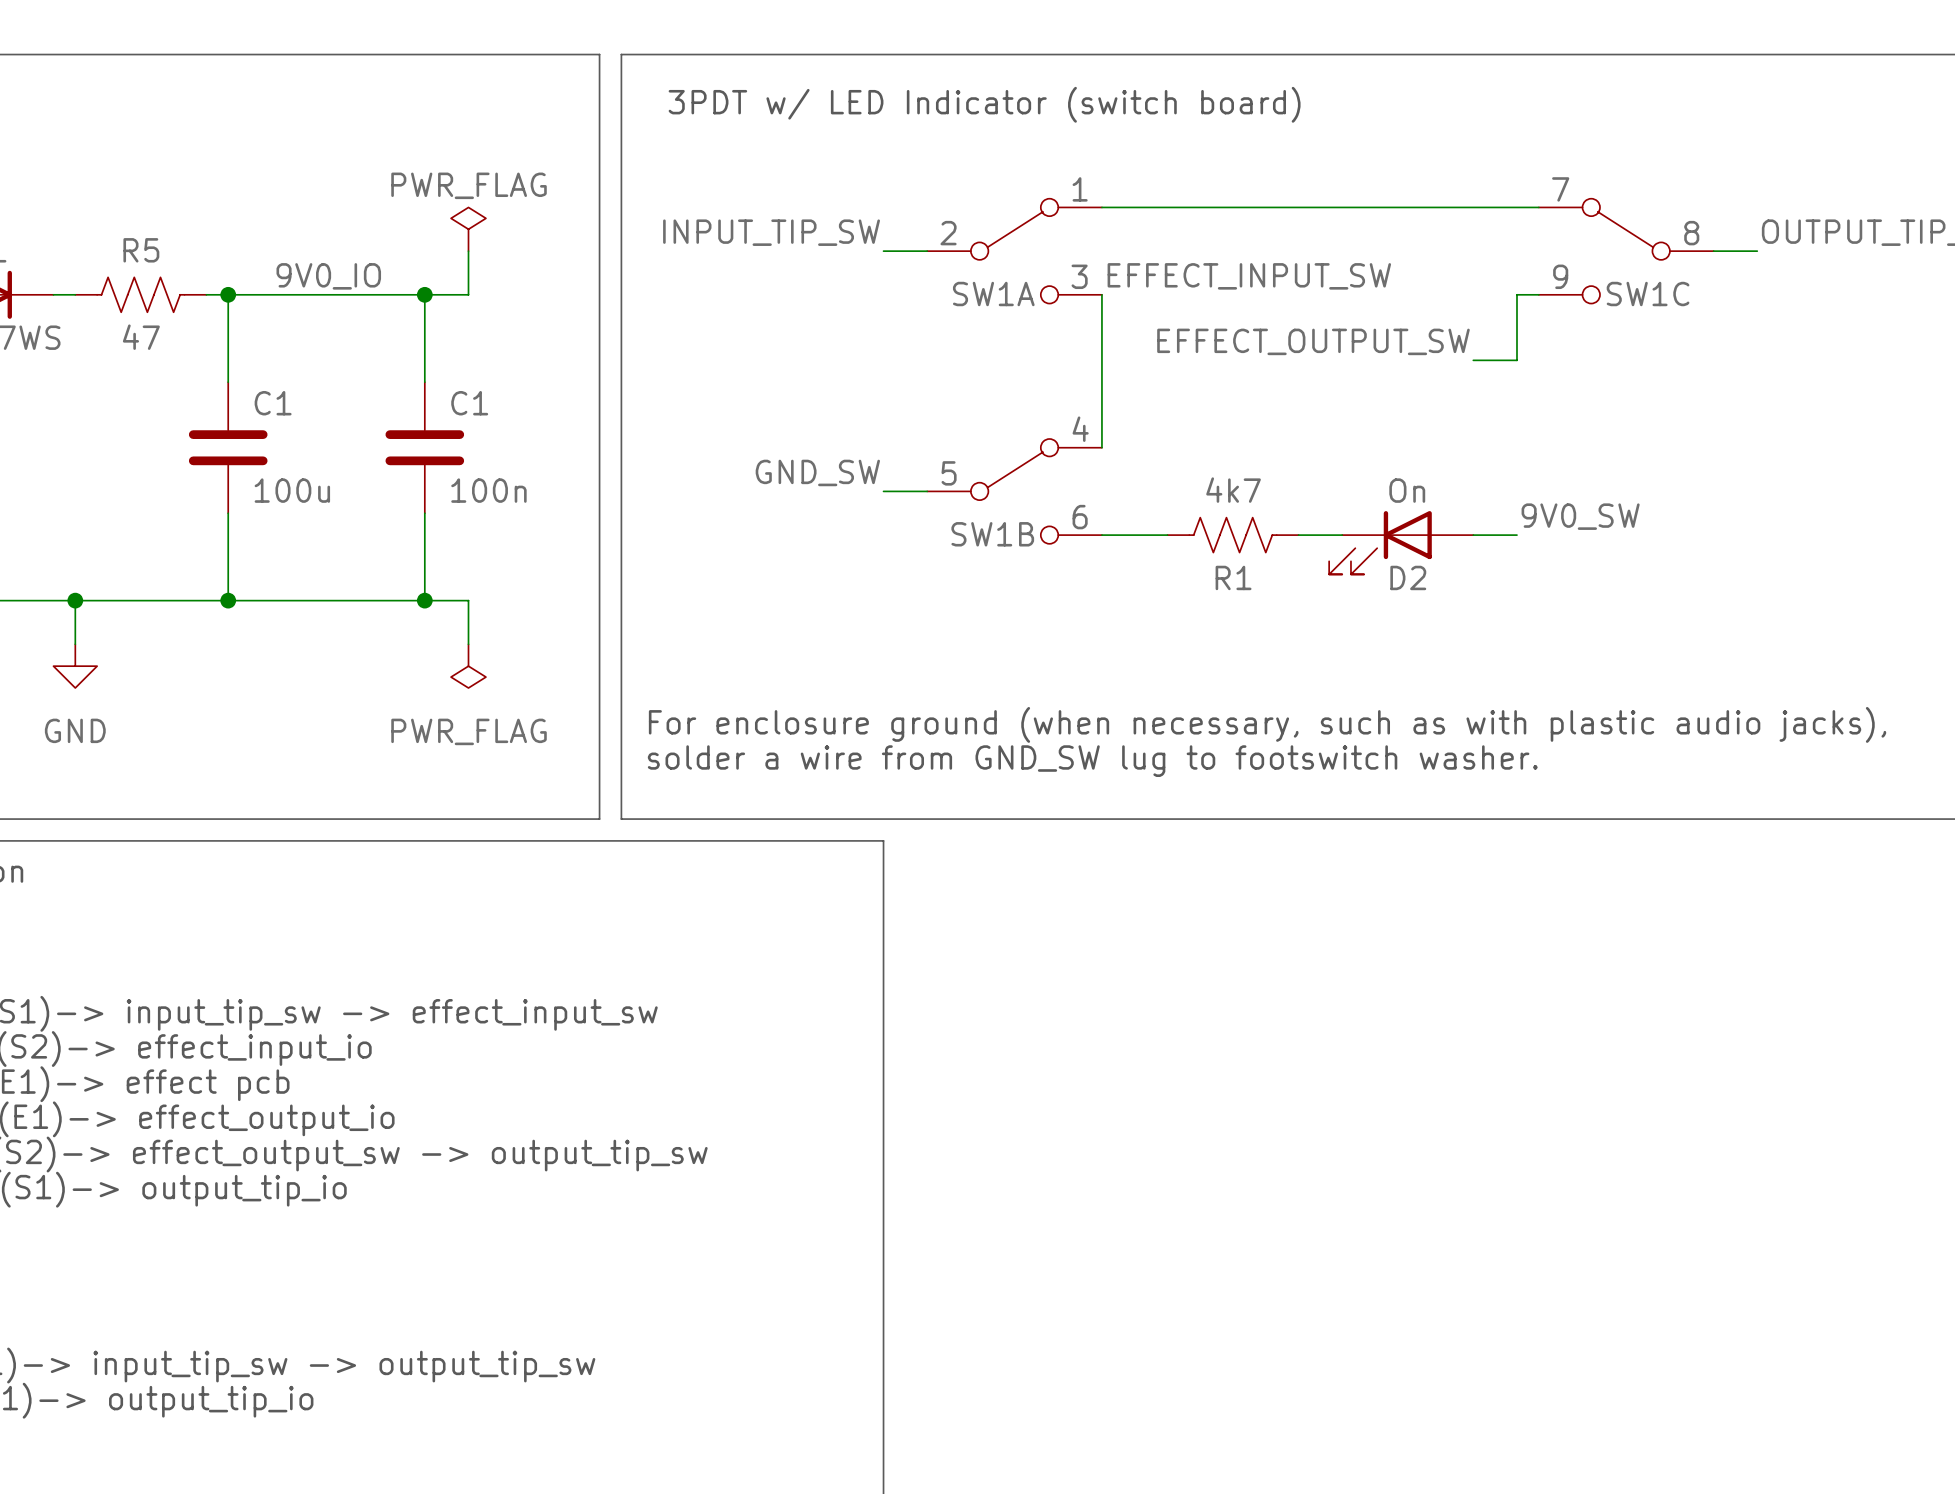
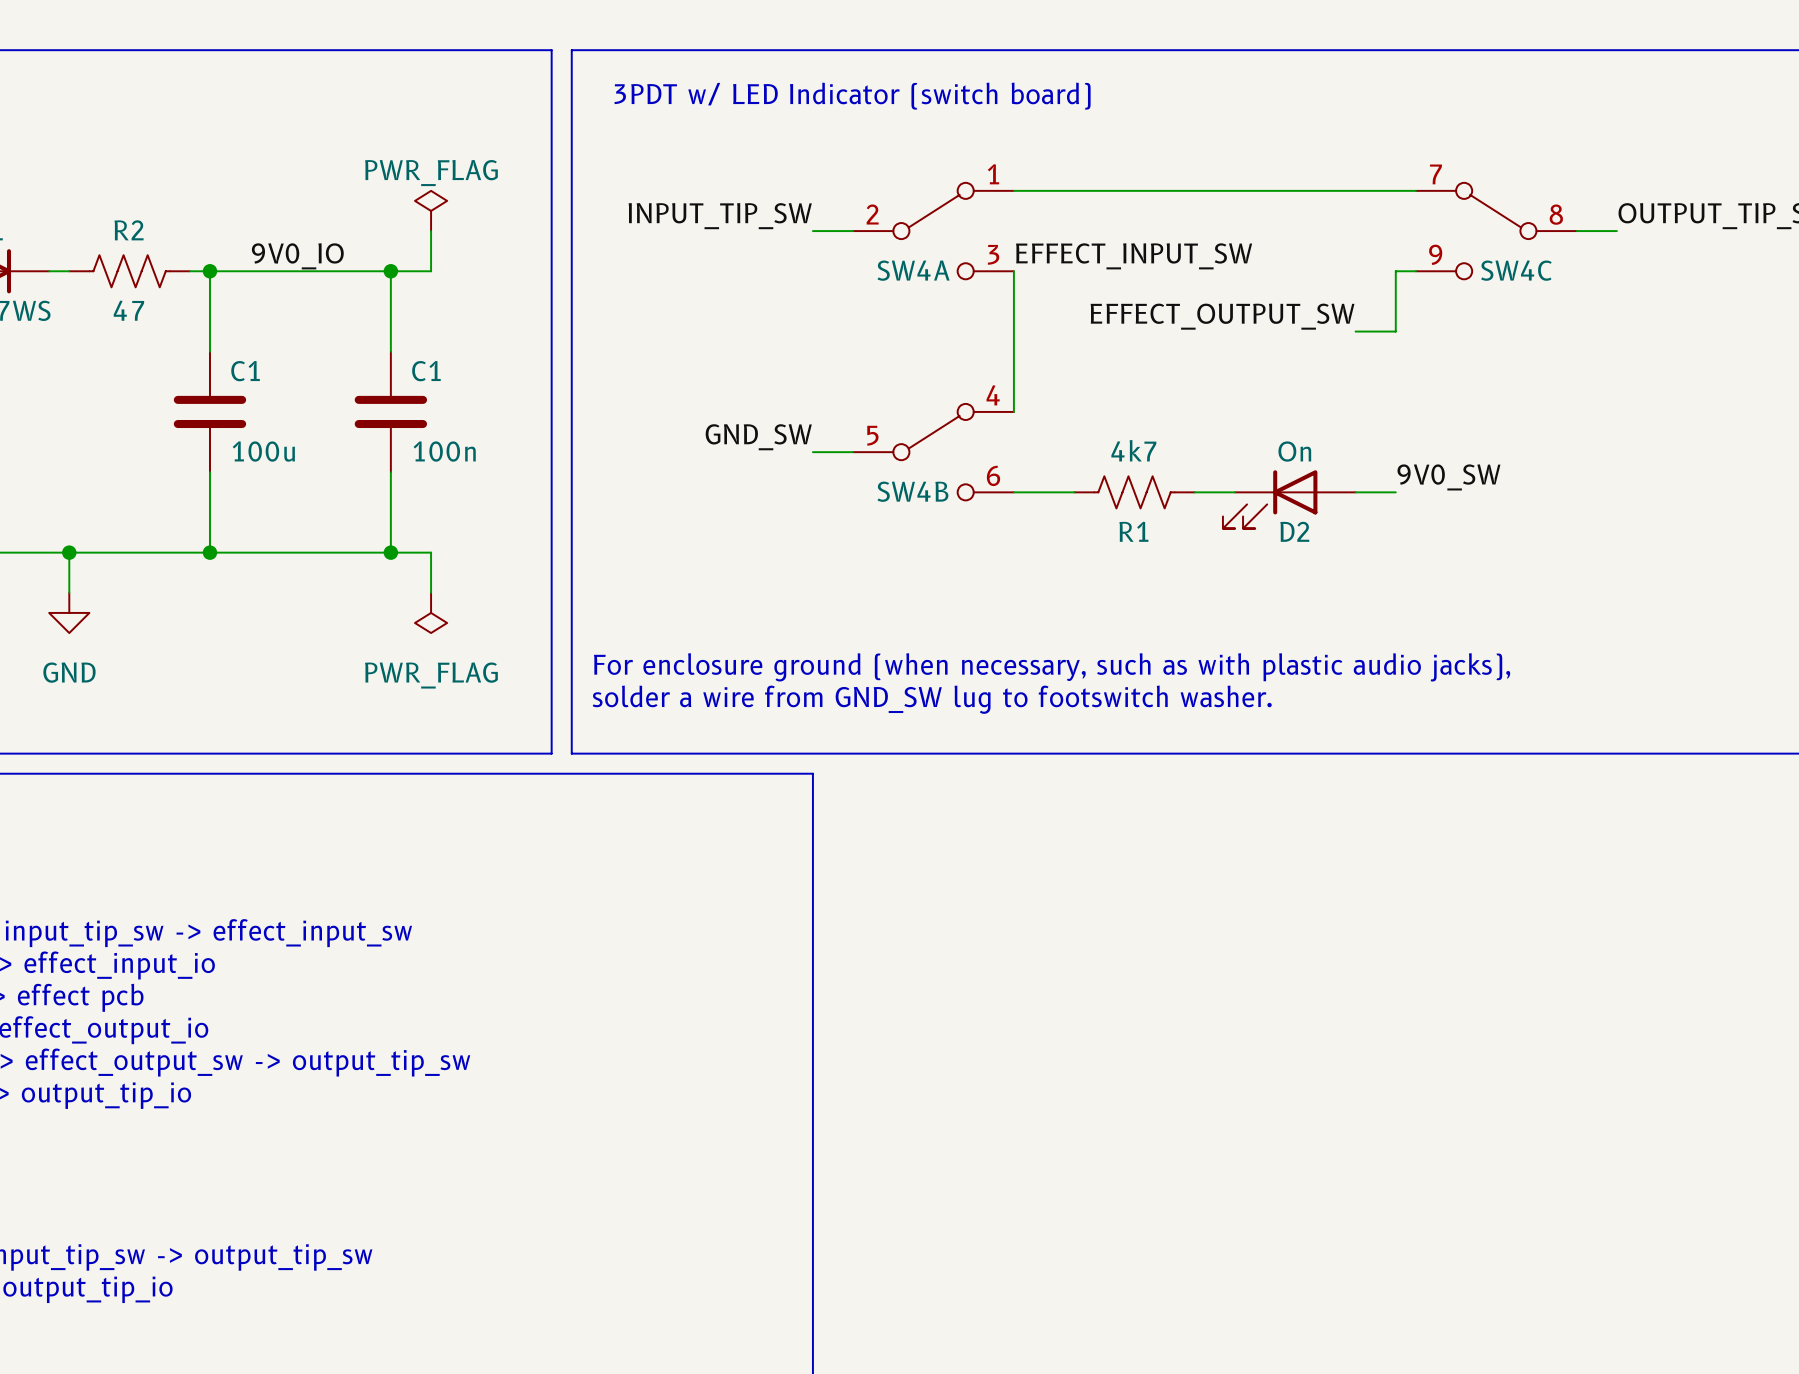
R5 name: R5 (141, 250) -> R2 (129, 230)
SW1A name: SW1A (993, 294) -> SW4A (913, 270)
SW1C name: SW1C (1648, 294) -> SW4C (1516, 270)
SW1B name: SW1B (992, 534) -> SW4B (912, 491)

